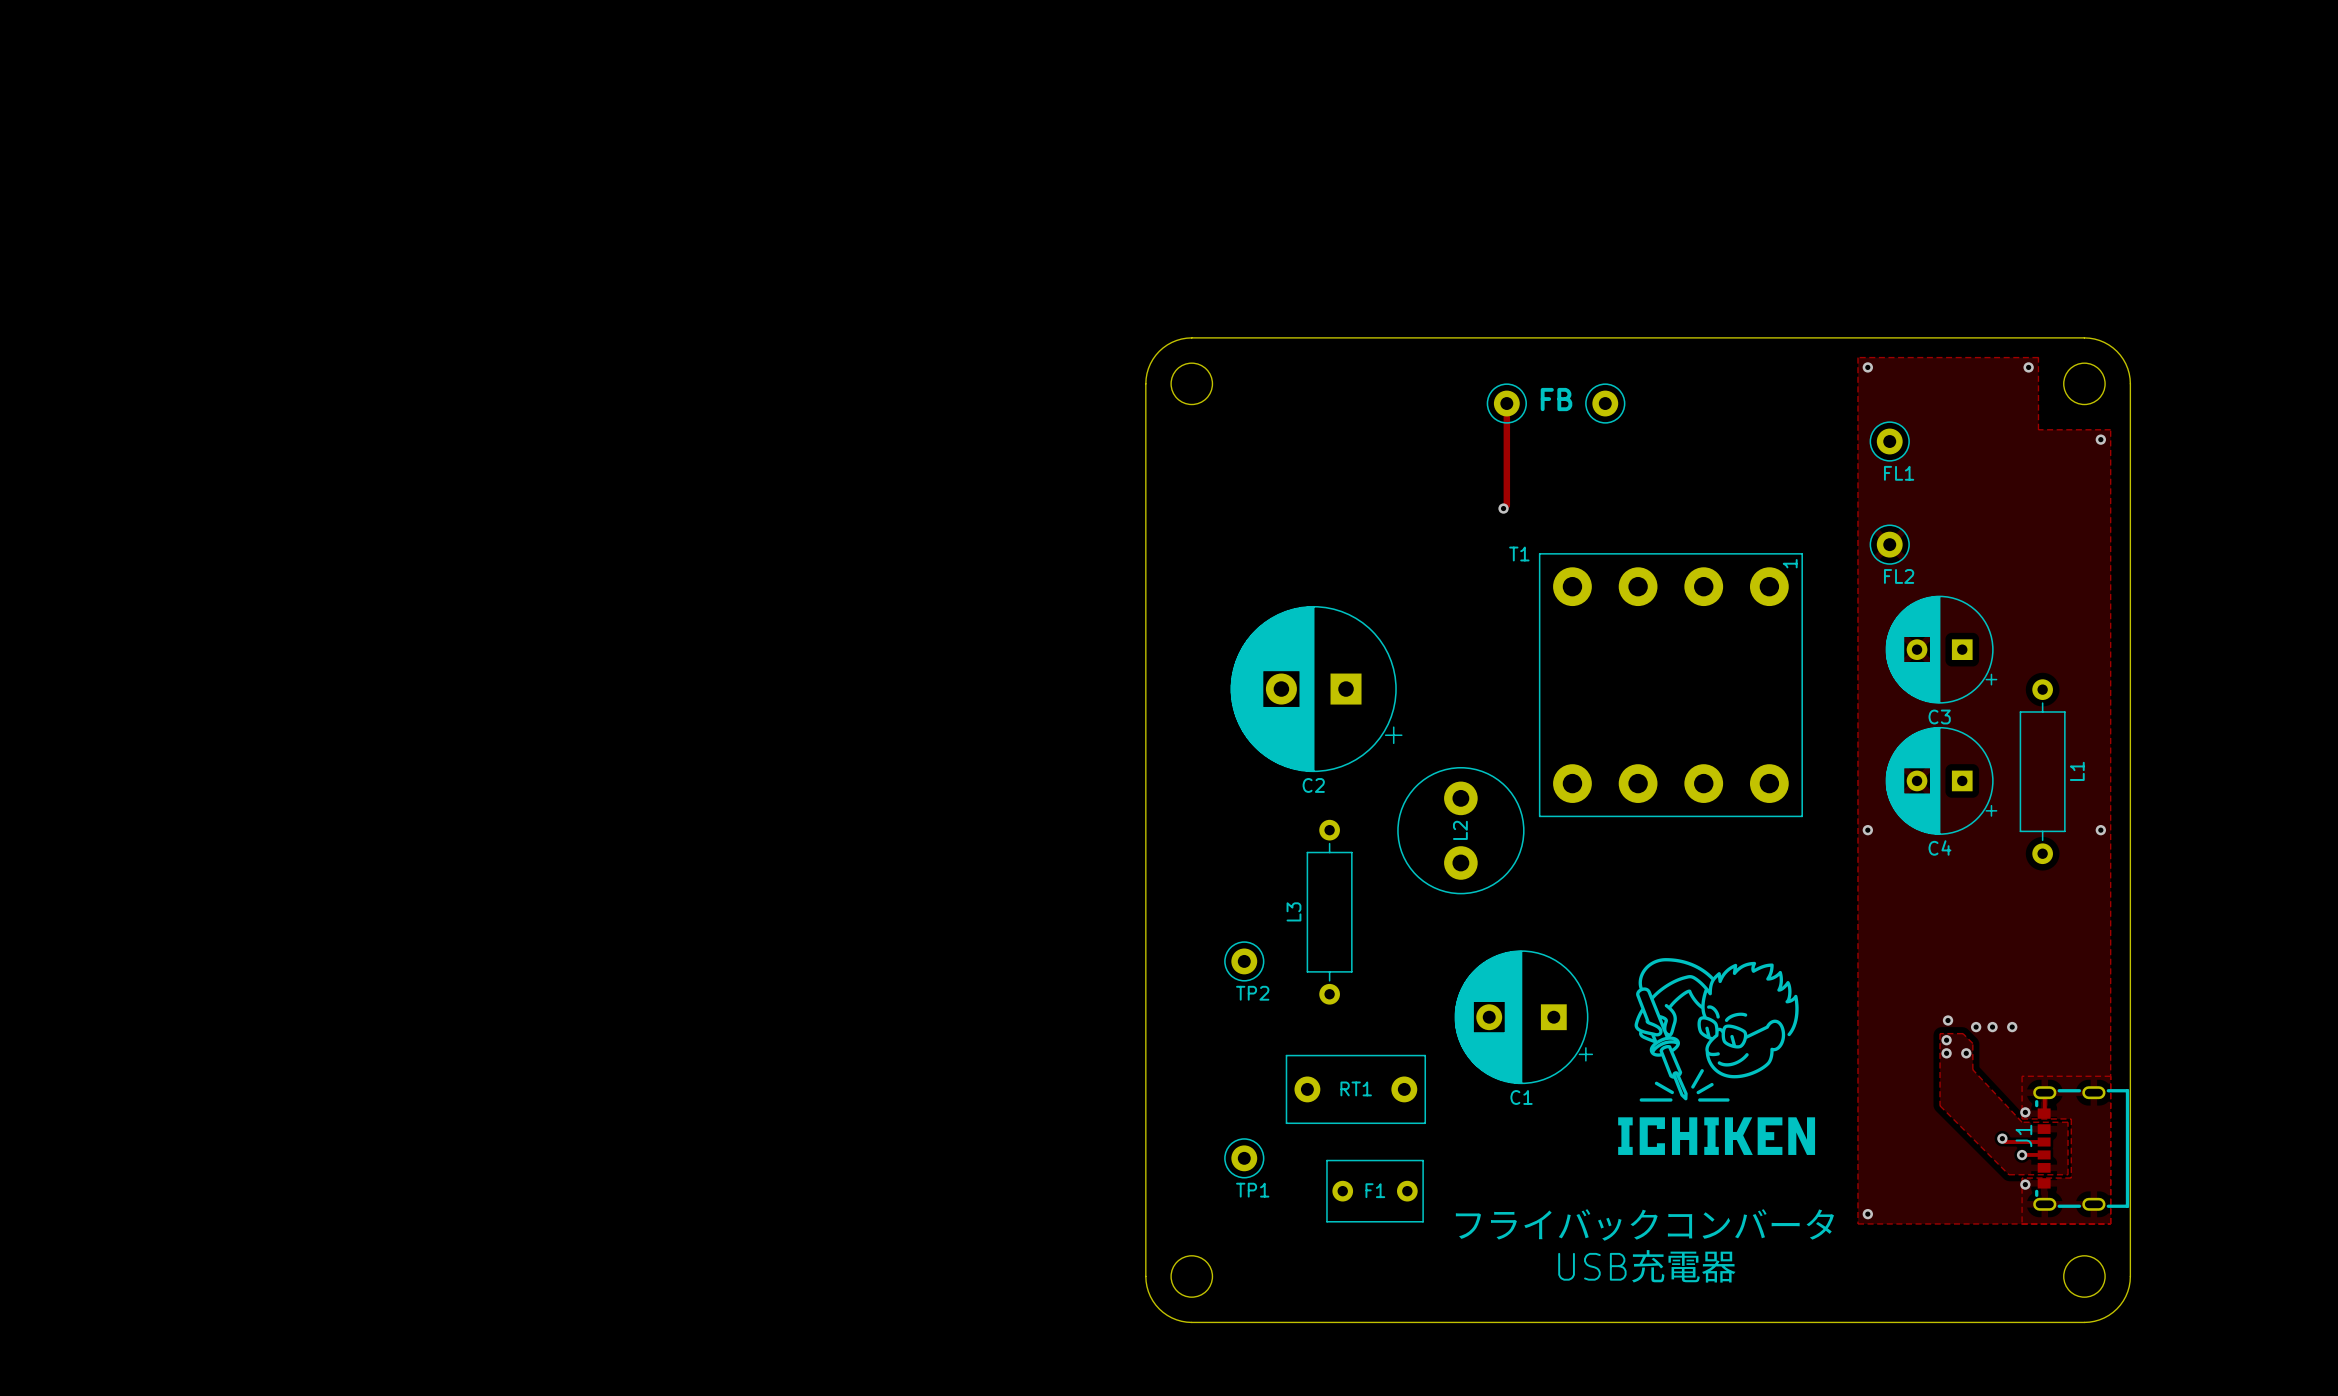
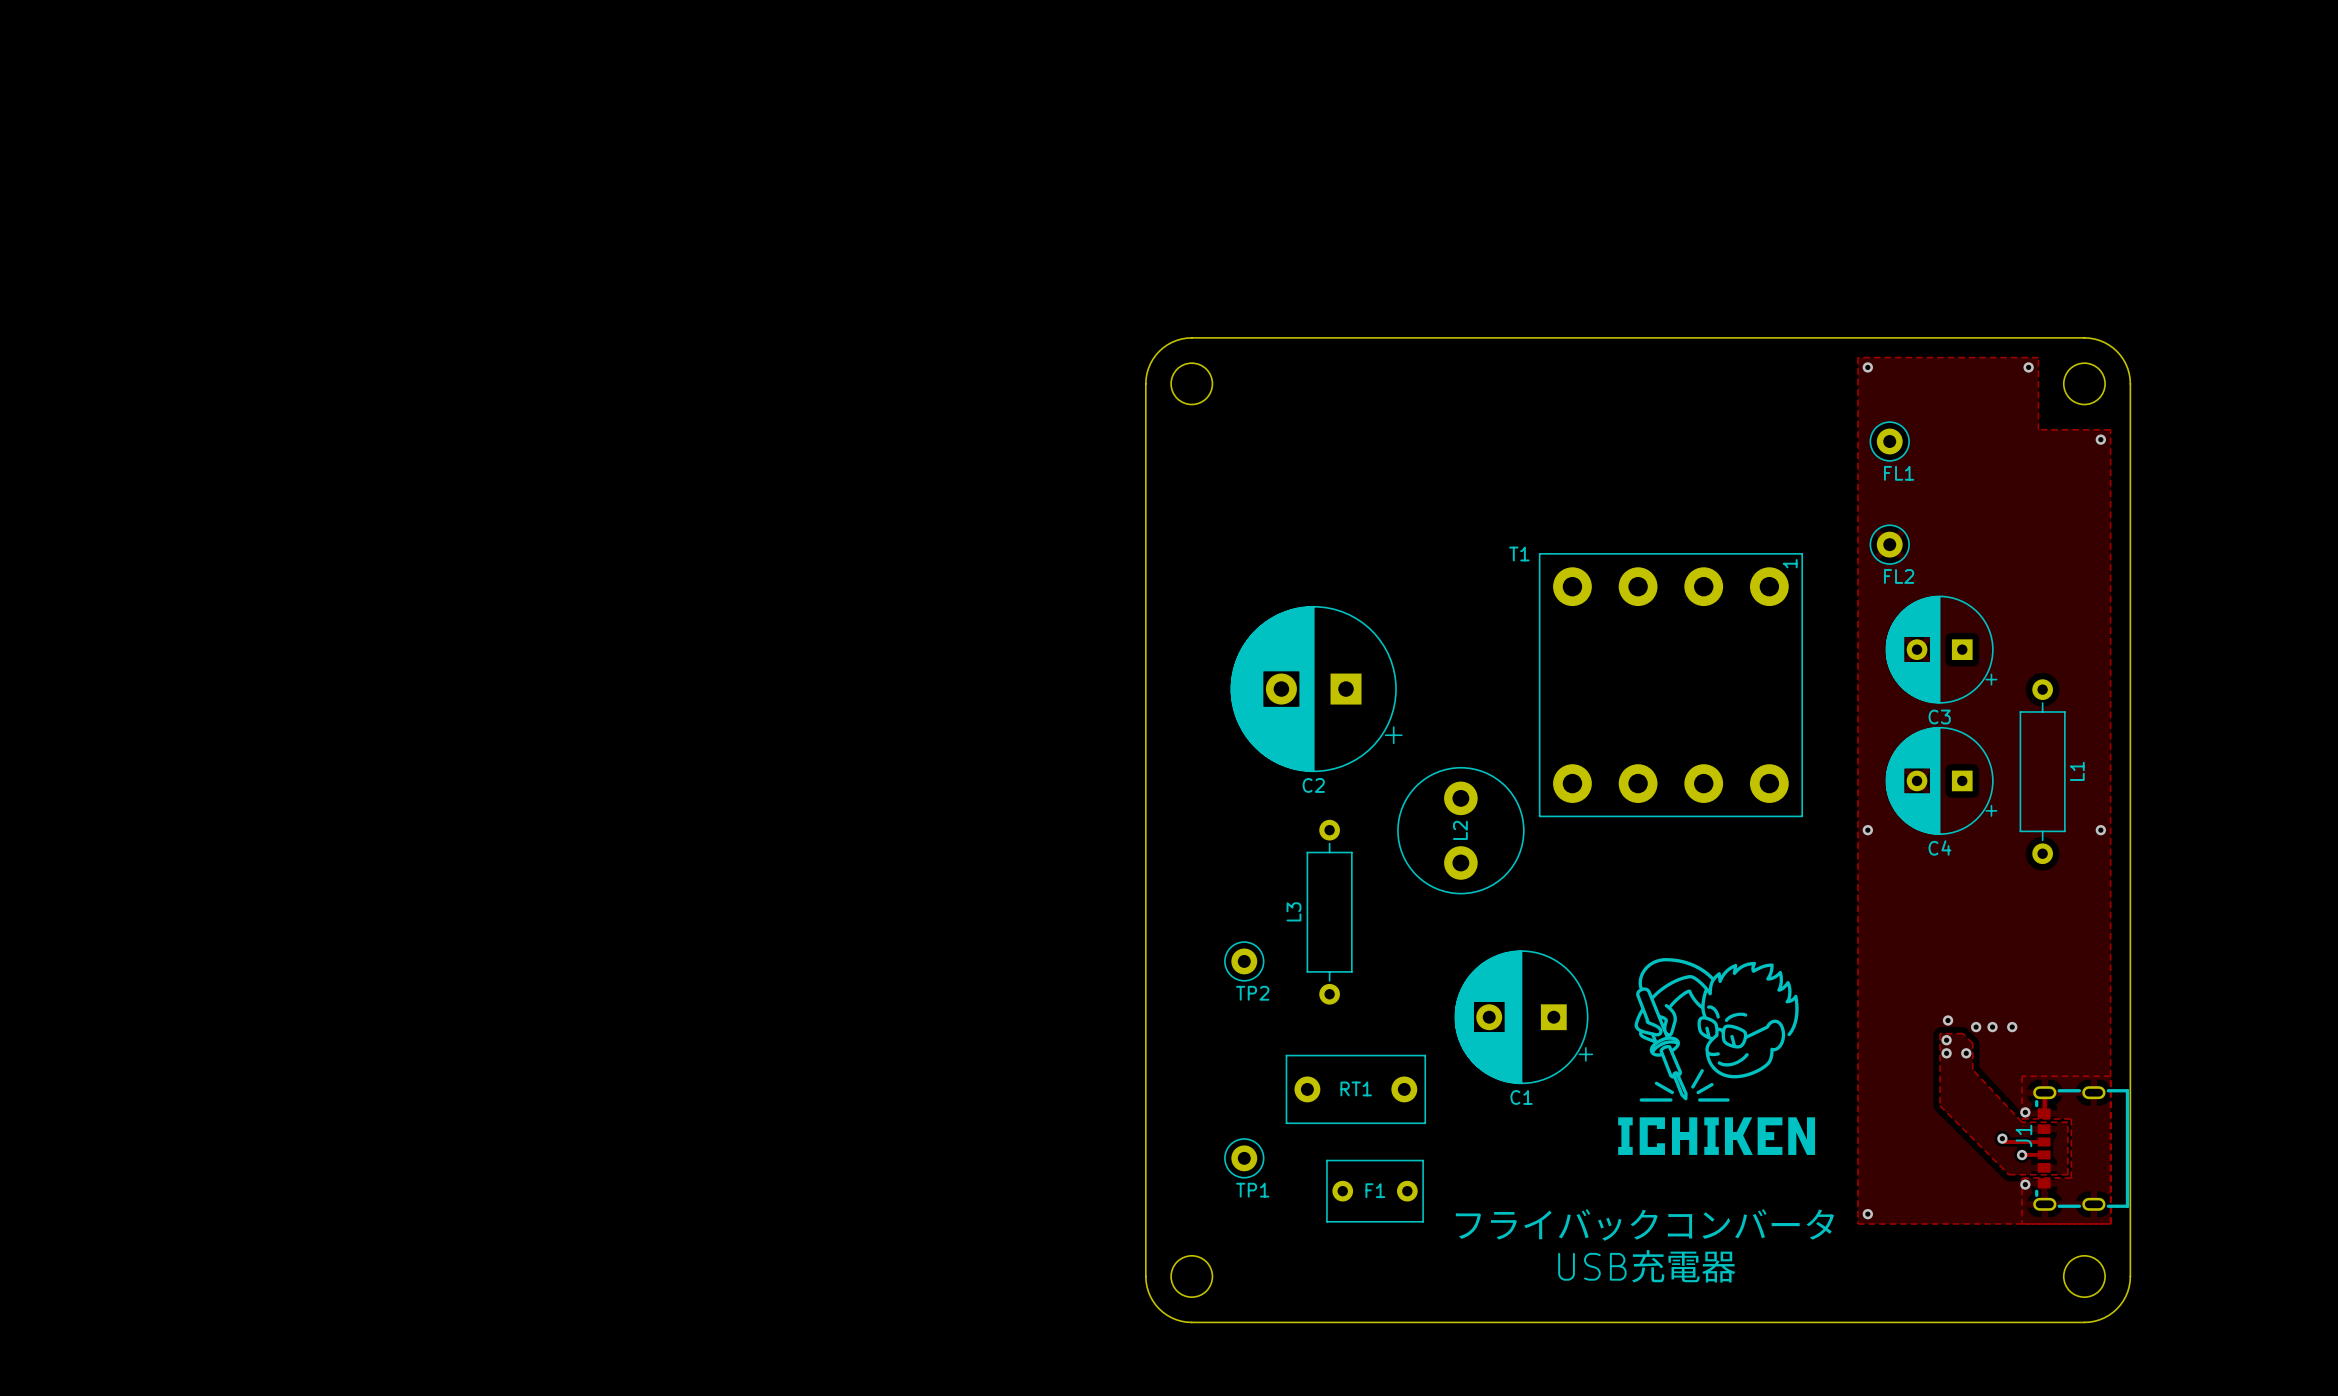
text: FB (1556, 399) -> none
track: (1506, 403) (1506, 505) (1503, 508) -> none
part: (1506, 403) -> none
part: (1605, 403) -> none
via: (1503, 508) -> none

